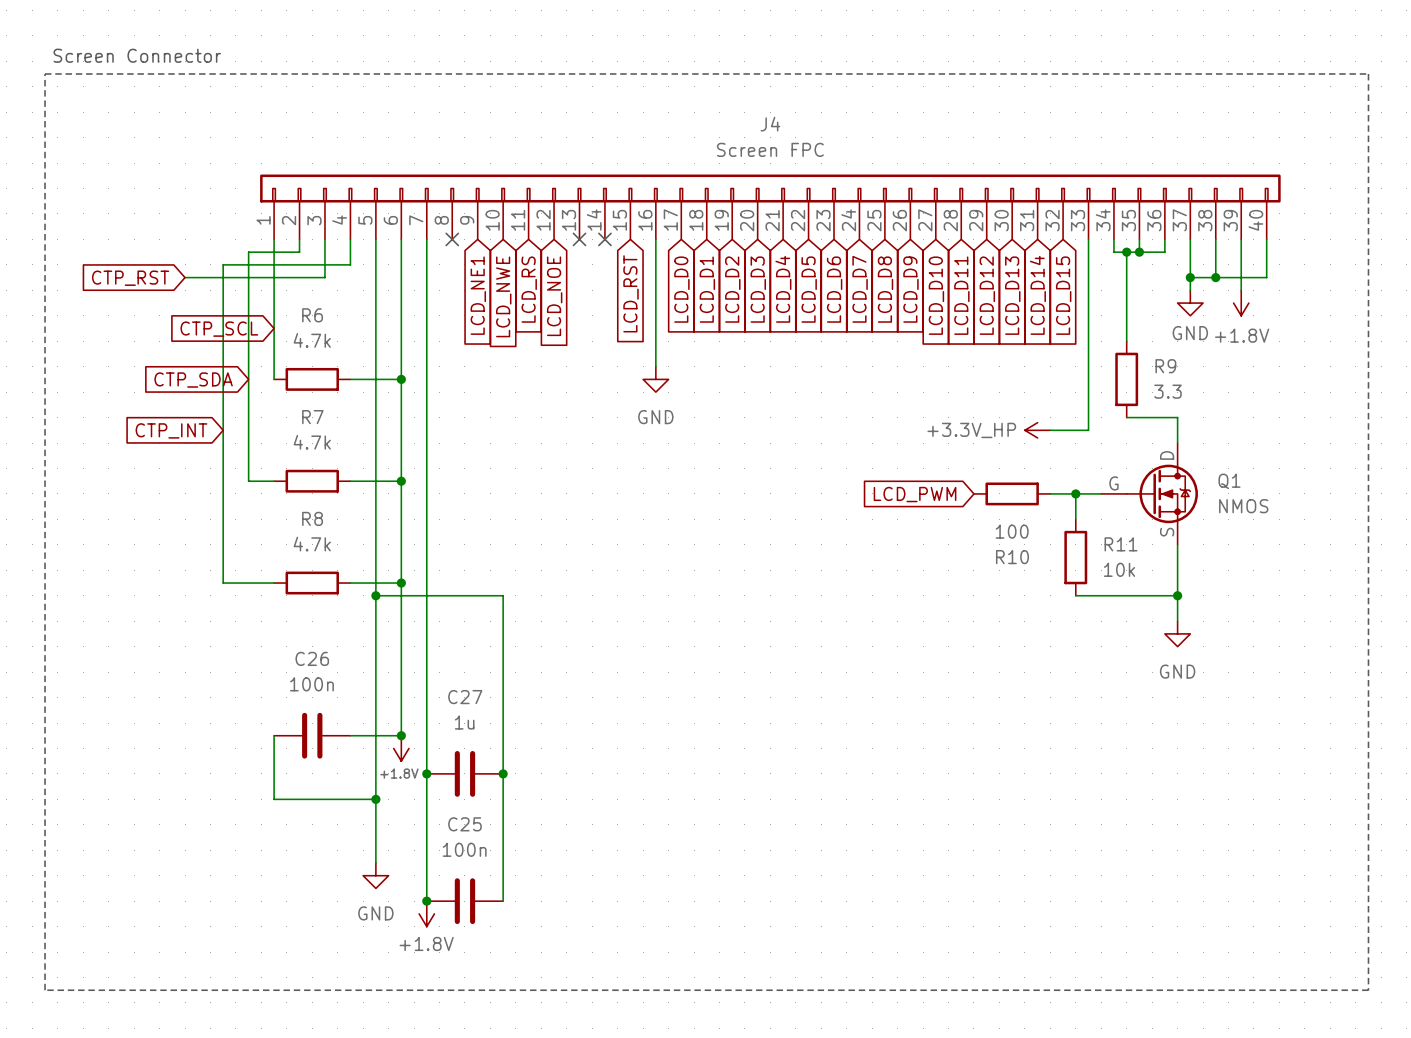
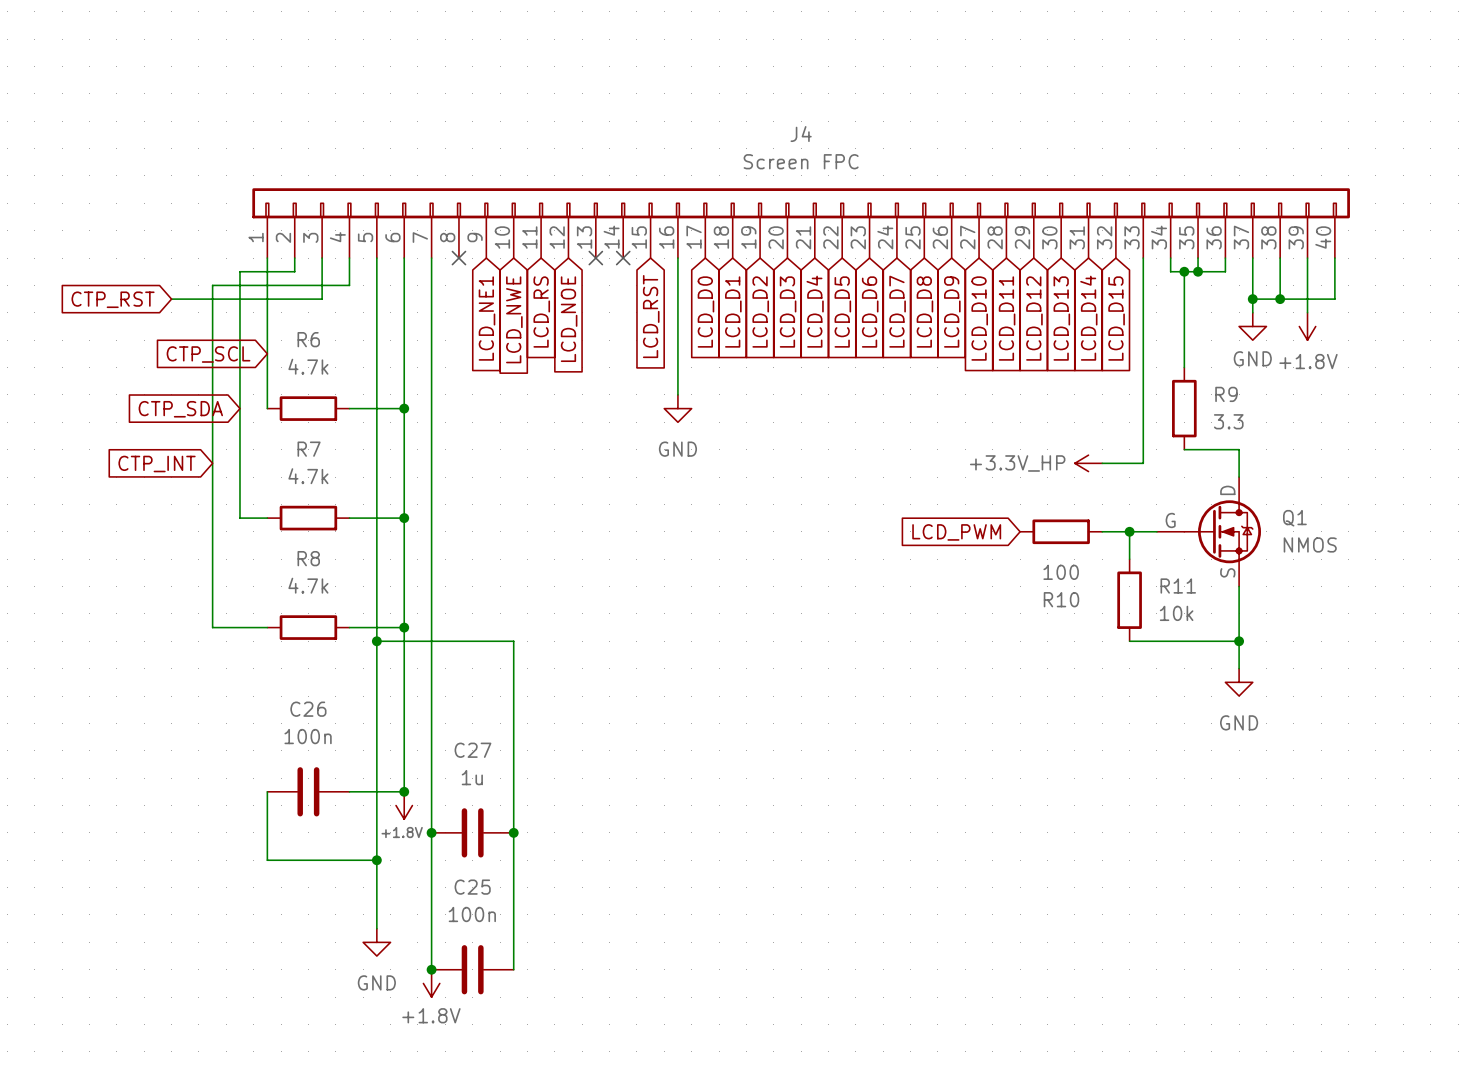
text: Screen Connector (137, 55) -> none
line: (45, 73) (1368, 73) (1368, 990) (45, 990) (45, 73) -> none

